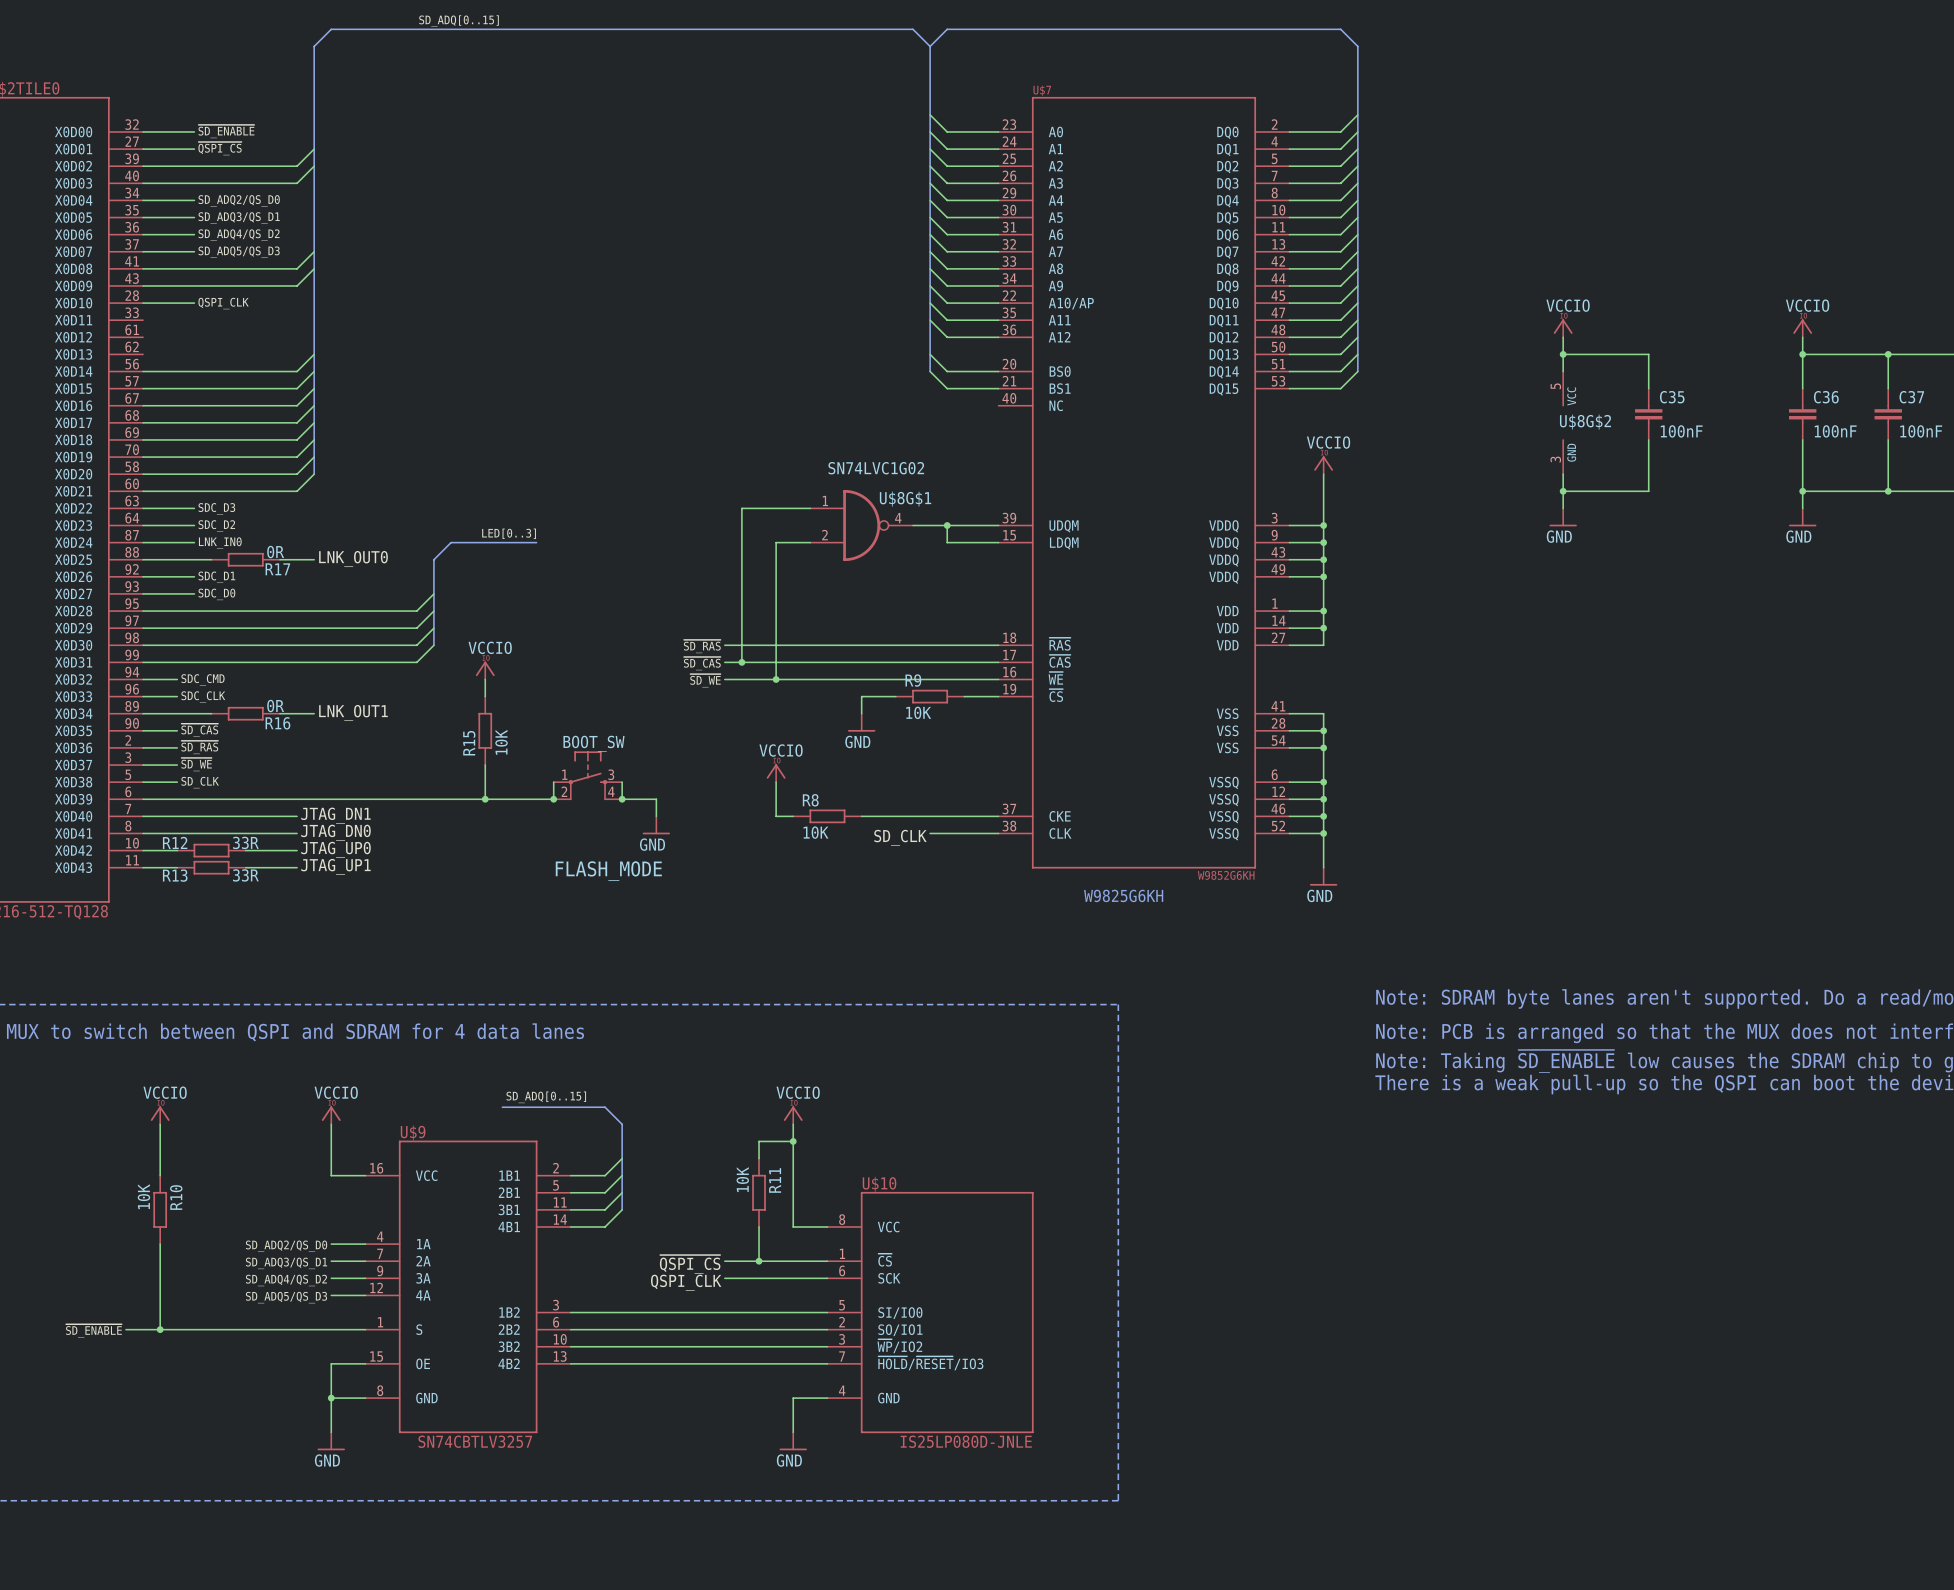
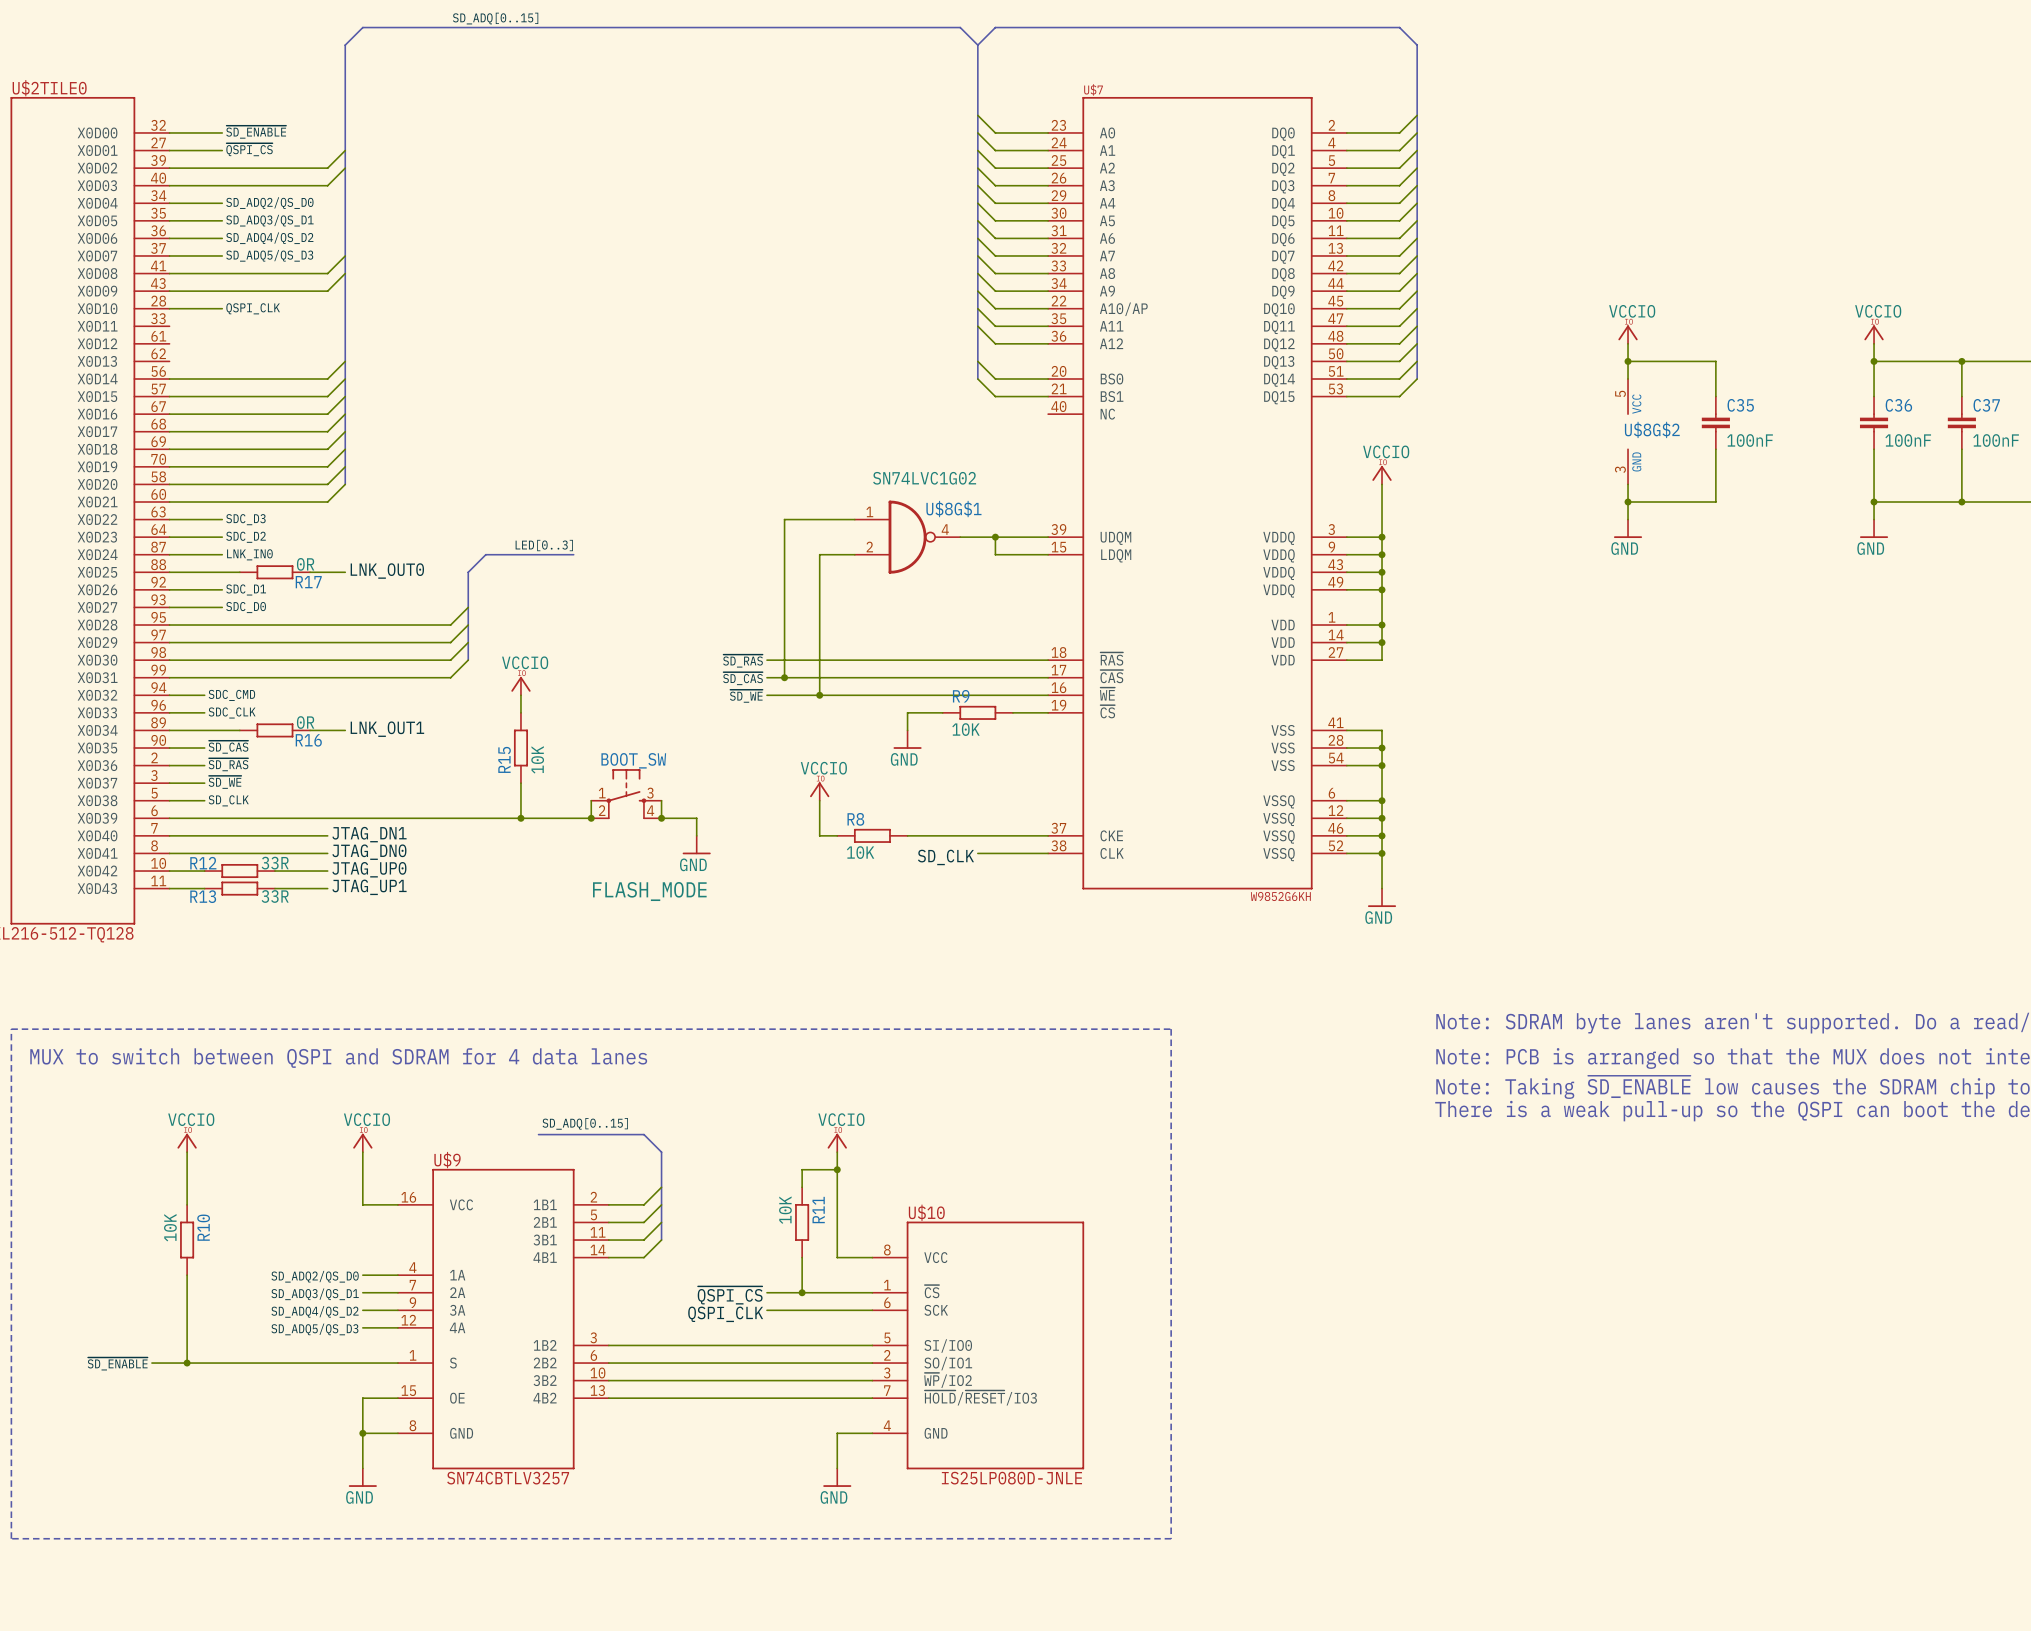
text: W9825G6KH (1123, 895) -> none

